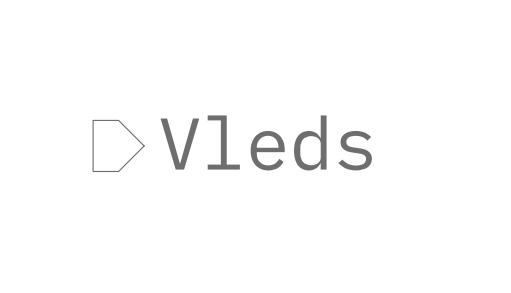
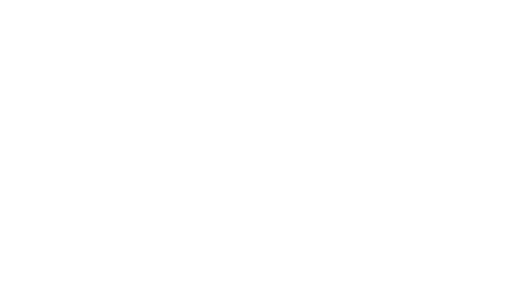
hierarchical label: Vleds (266, 142) -> none

